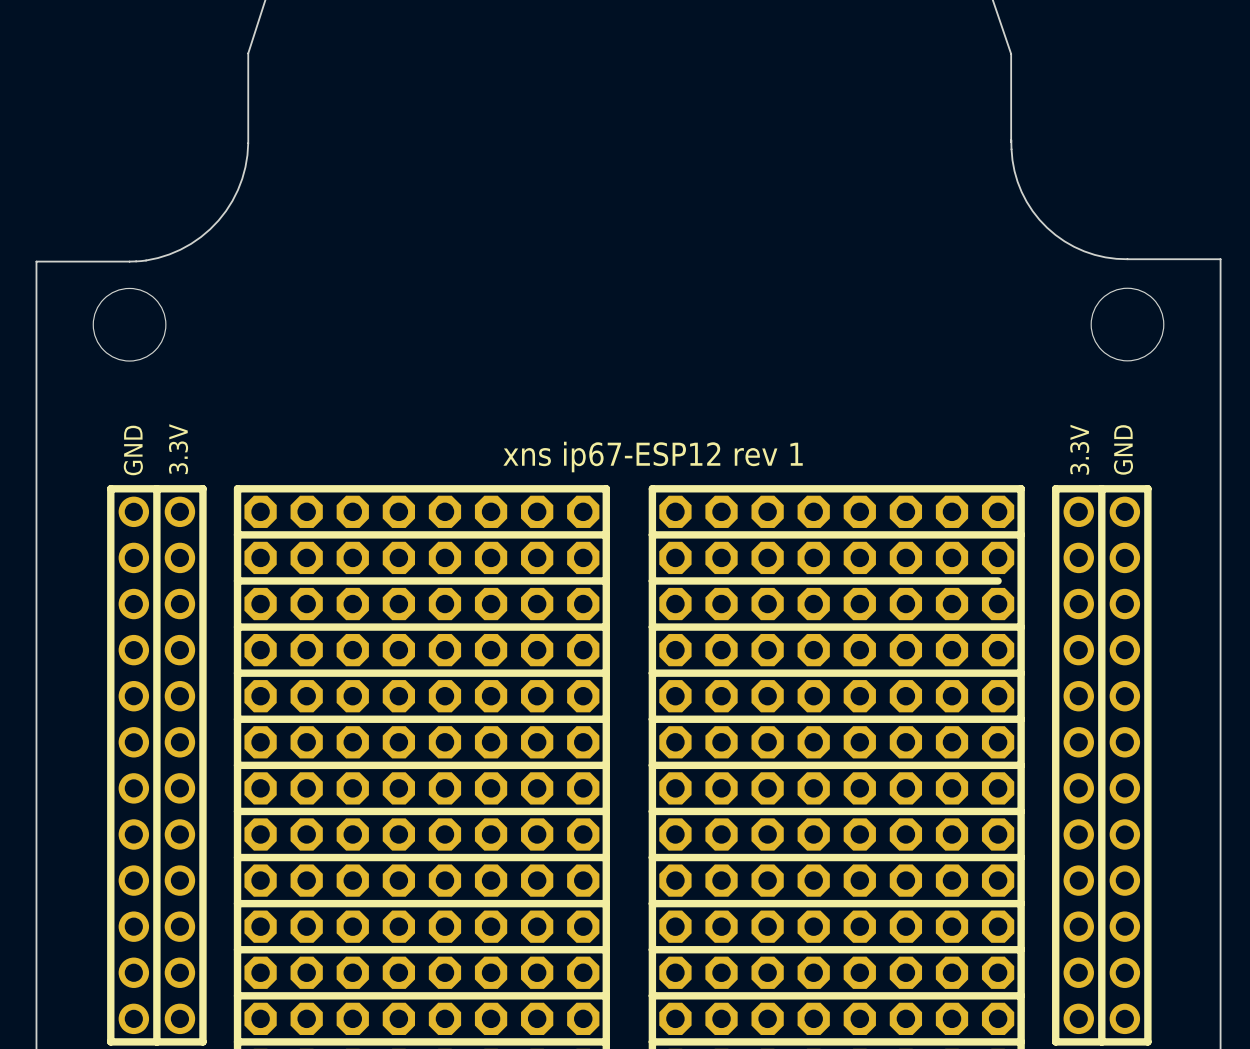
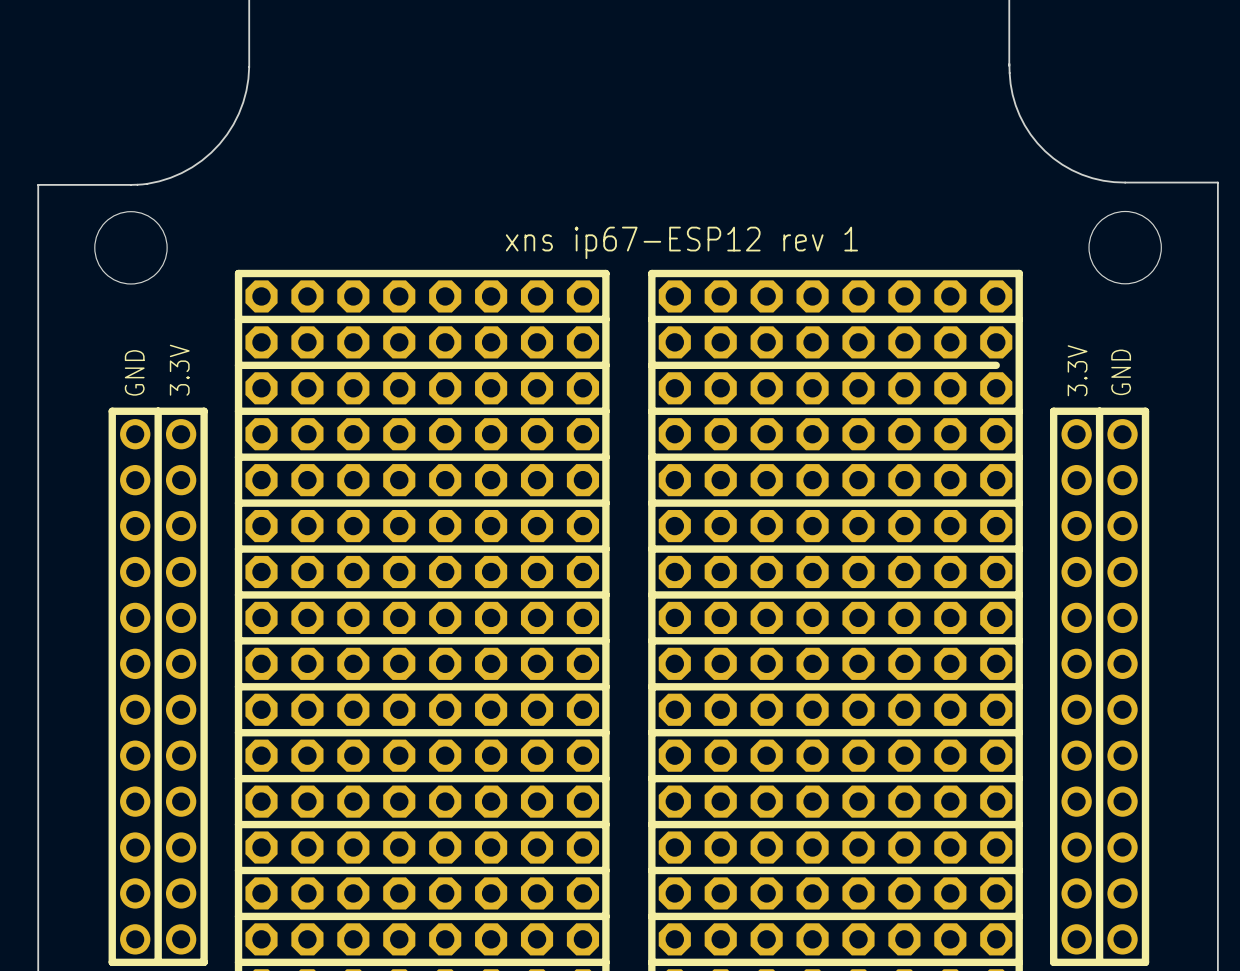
part: none -> (422, 296)
part: none -> (835, 296)
line: none -> (238, 319) (605, 319)
line: none -> (651, 319) (1019, 319)
part: none -> (422, 342)
part: none -> (835, 342)
line: none -> (238, 365) (605, 365)
line: none -> (651, 365) (996, 365)
text position: xns ip67-ESP12 rev 1 (653, 457) -> xns ip67-ESP12 rev 1 (681, 242)
part: none -> (422, 388)
part: none -> (835, 388)
line: none -> (238, 411) (238, 273) (605, 273) (605, 411)
line: none -> (651, 411) (651, 273) (1019, 273) (1019, 411)
line: none -> (996, 503) (1019, 503)

